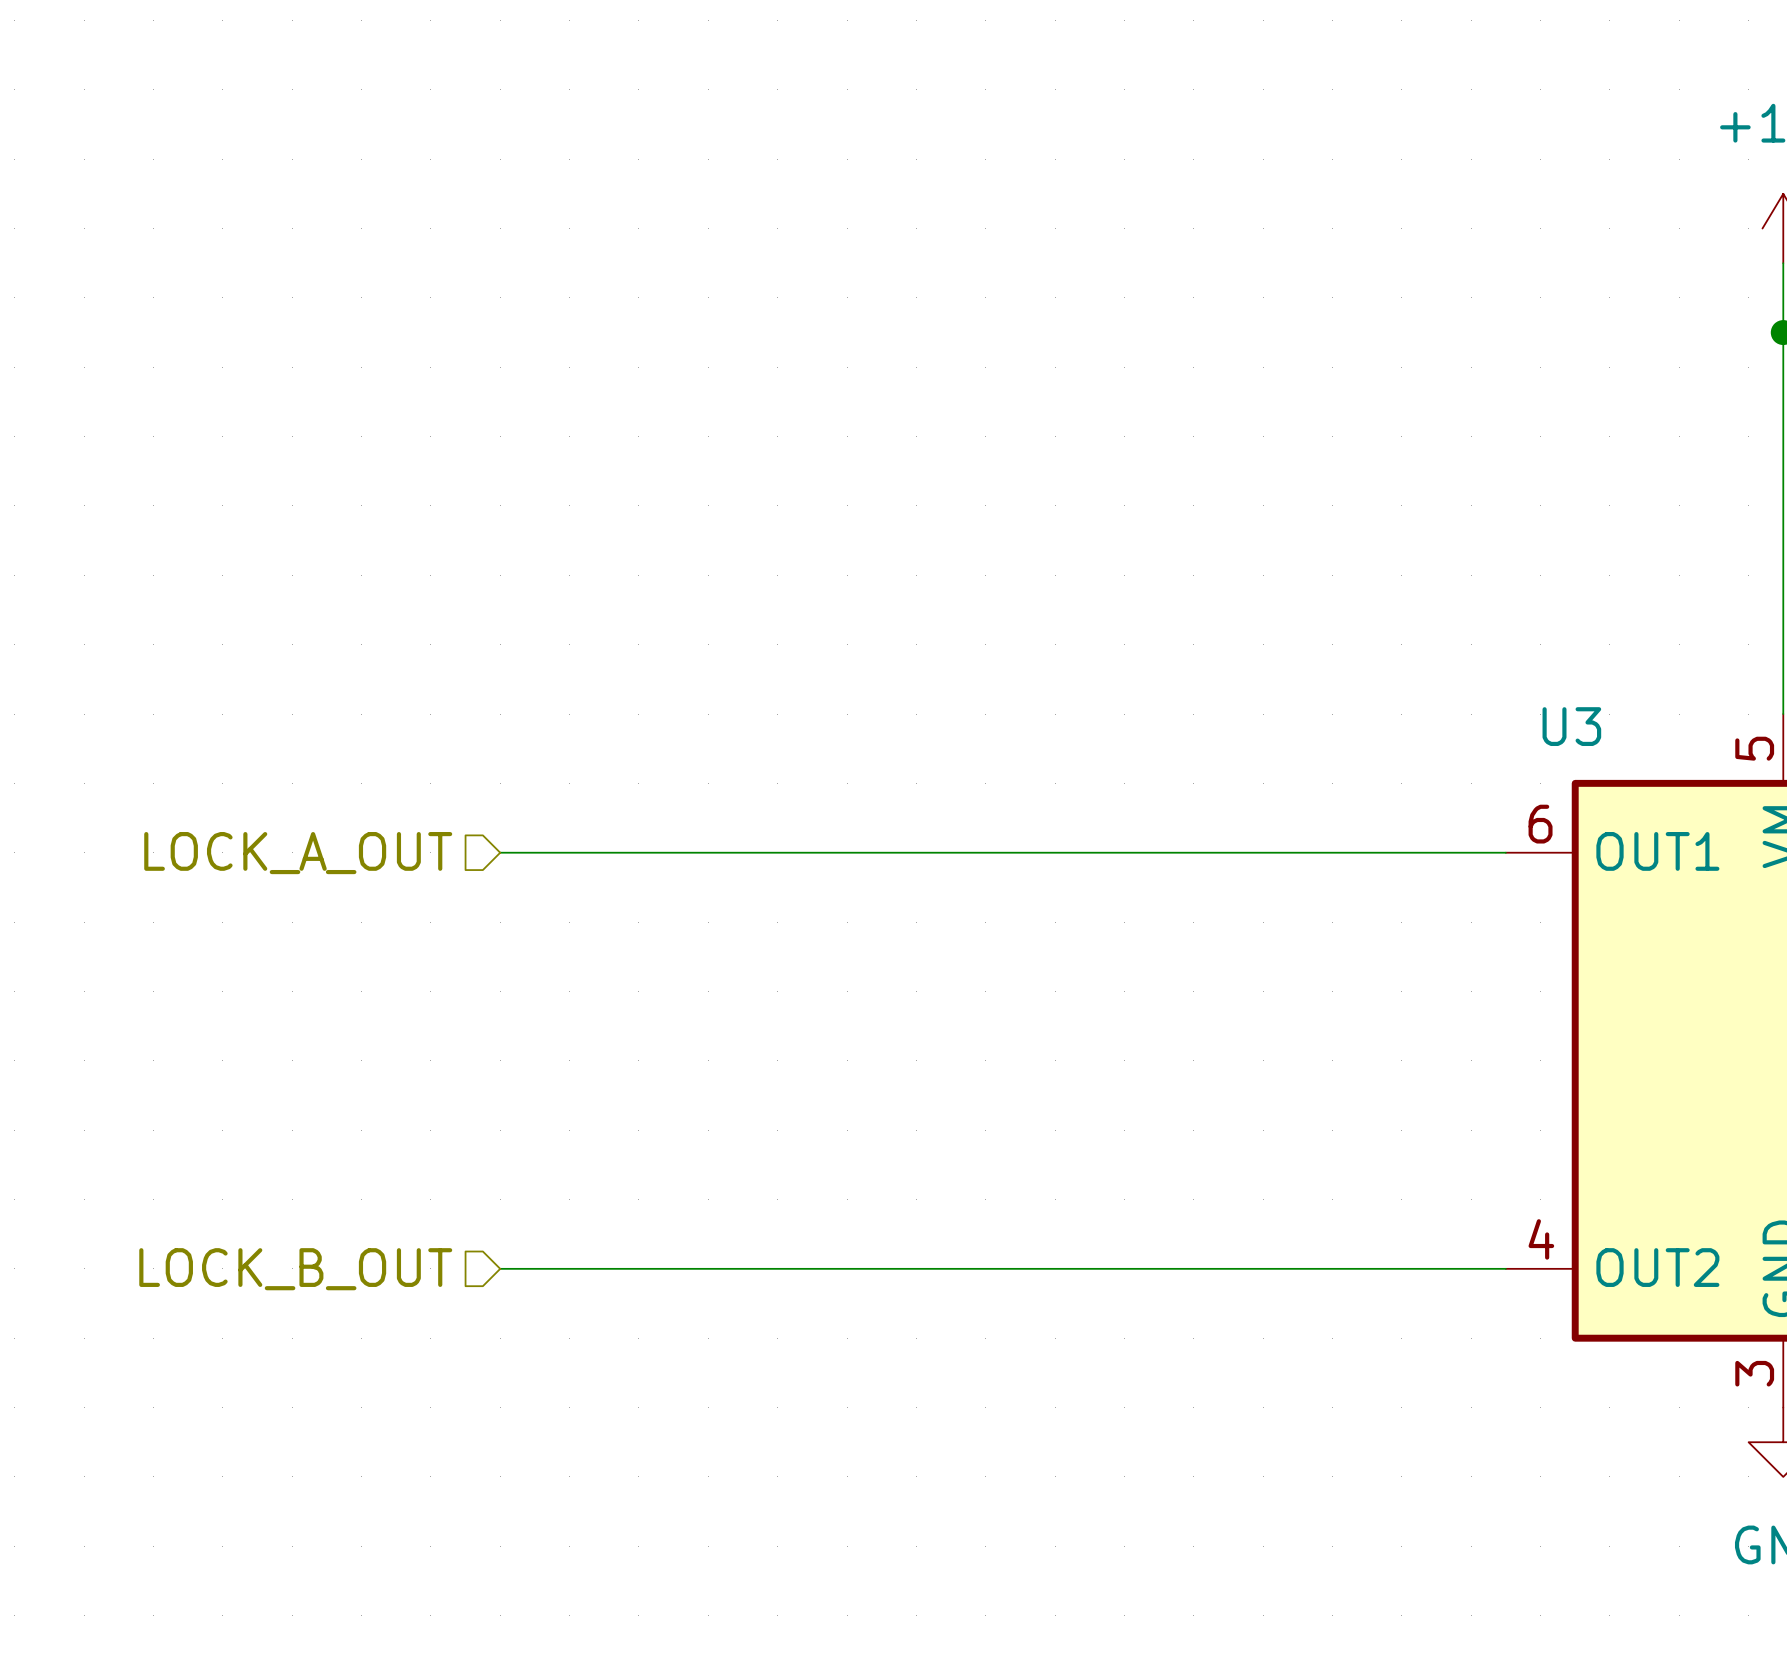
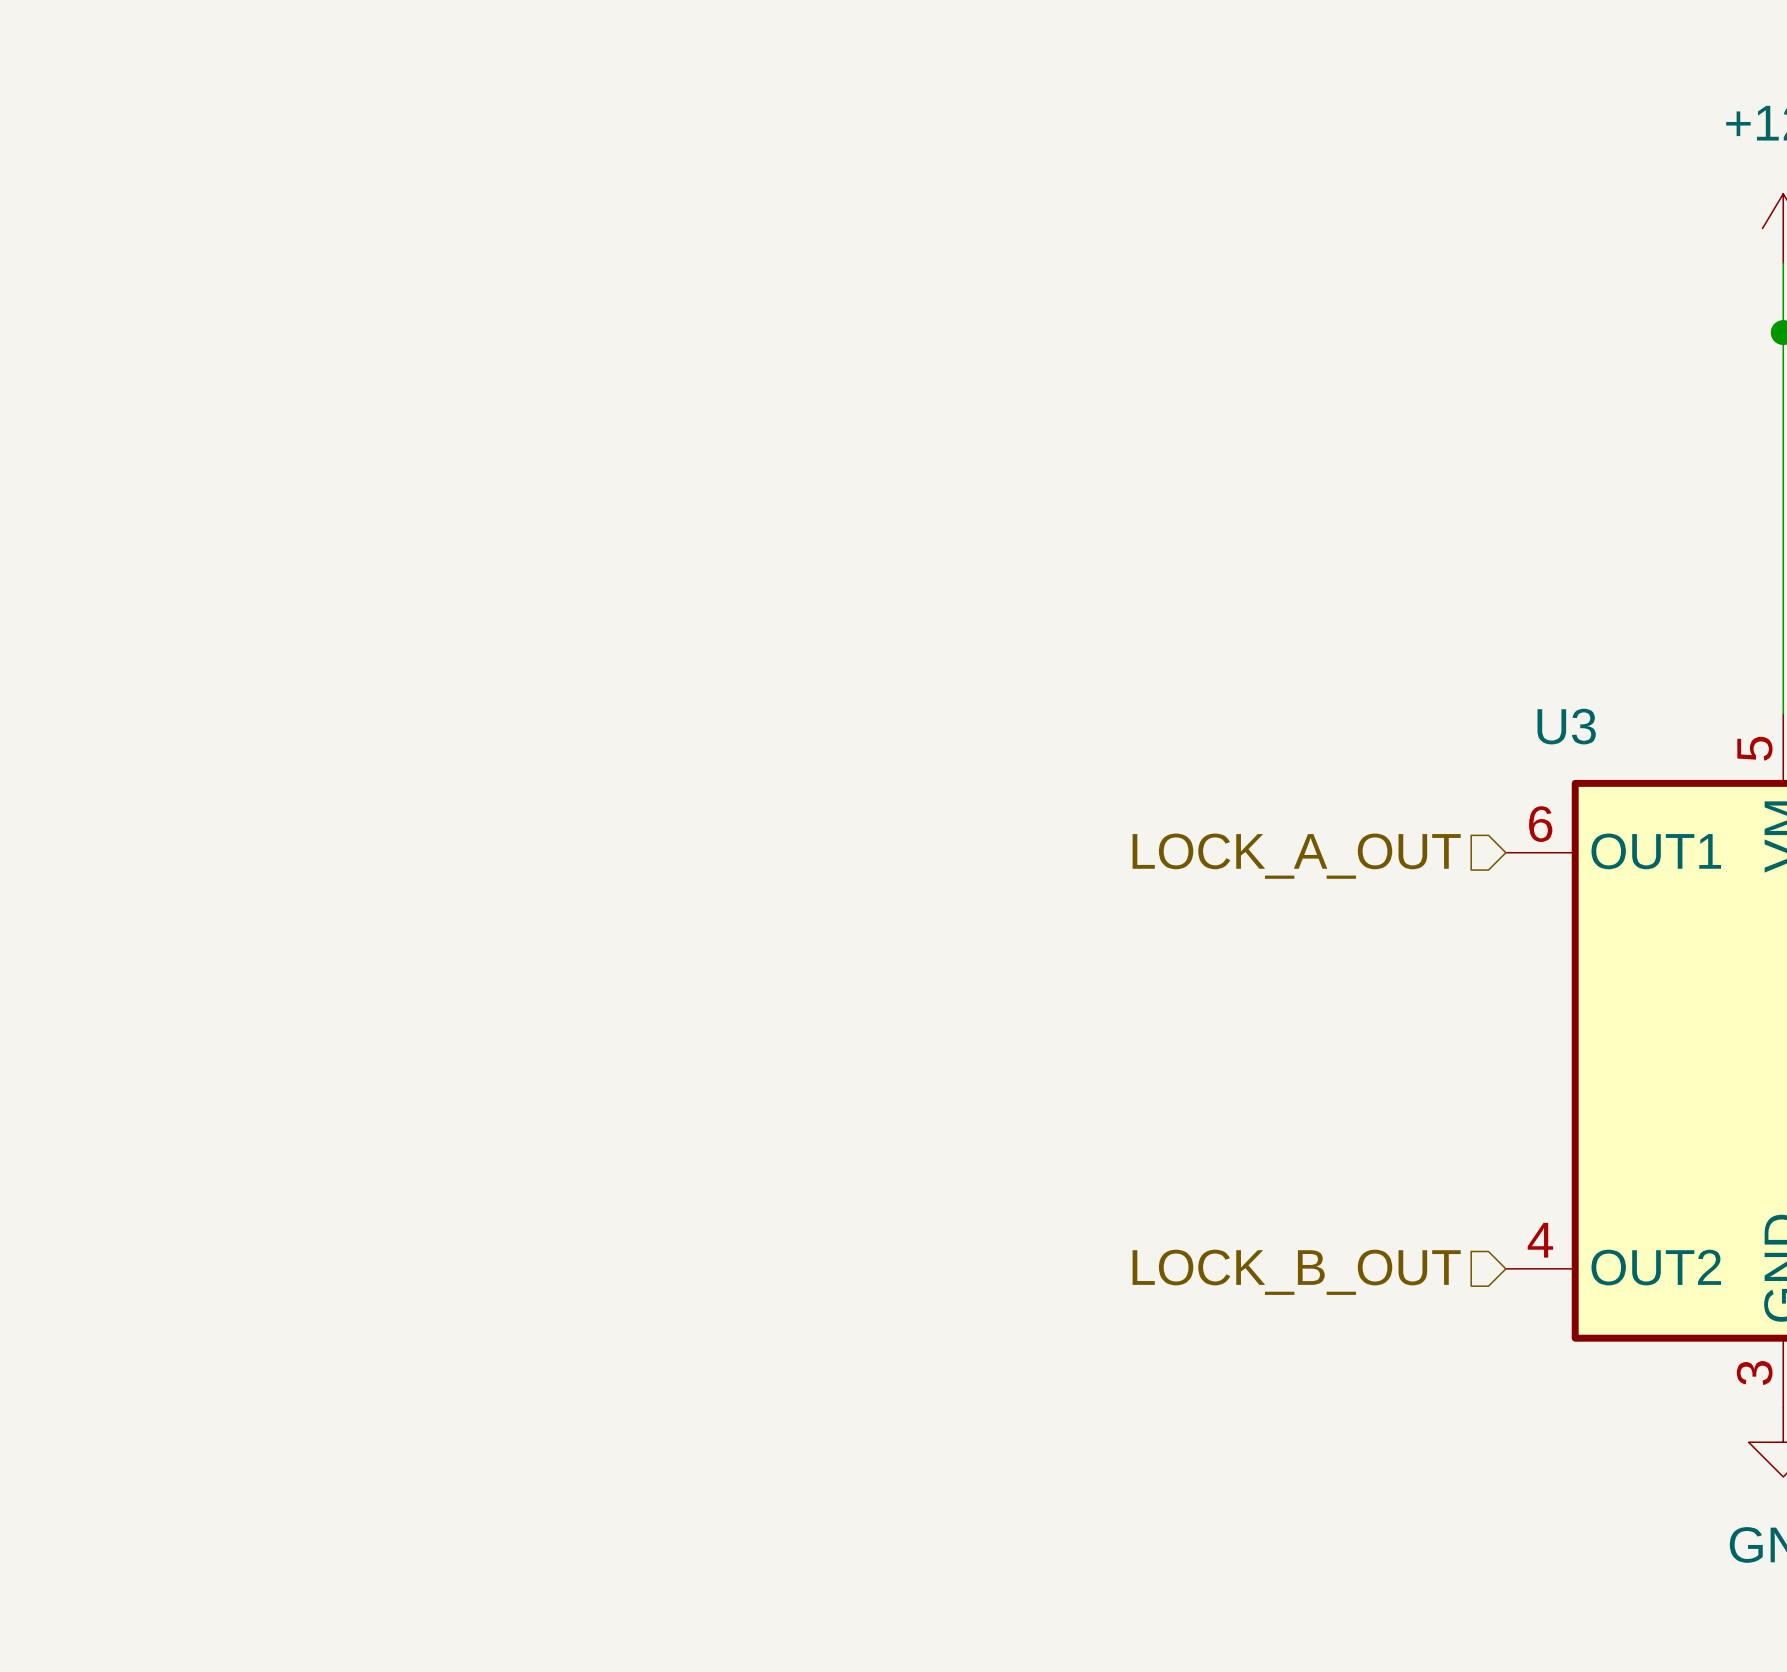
wire: (500, 852) (1505, 852) -> none
hierarchical label: LOCK_A_OUT (298, 853) -> none
hierarchical label: none -> LOCK_A_OUT (1296, 856)
wire: (500, 1268) (1505, 1268) -> none
hierarchical label: LOCK_B_OUT (295, 1269) -> none
hierarchical label: none -> LOCK_B_OUT (1296, 1272)

